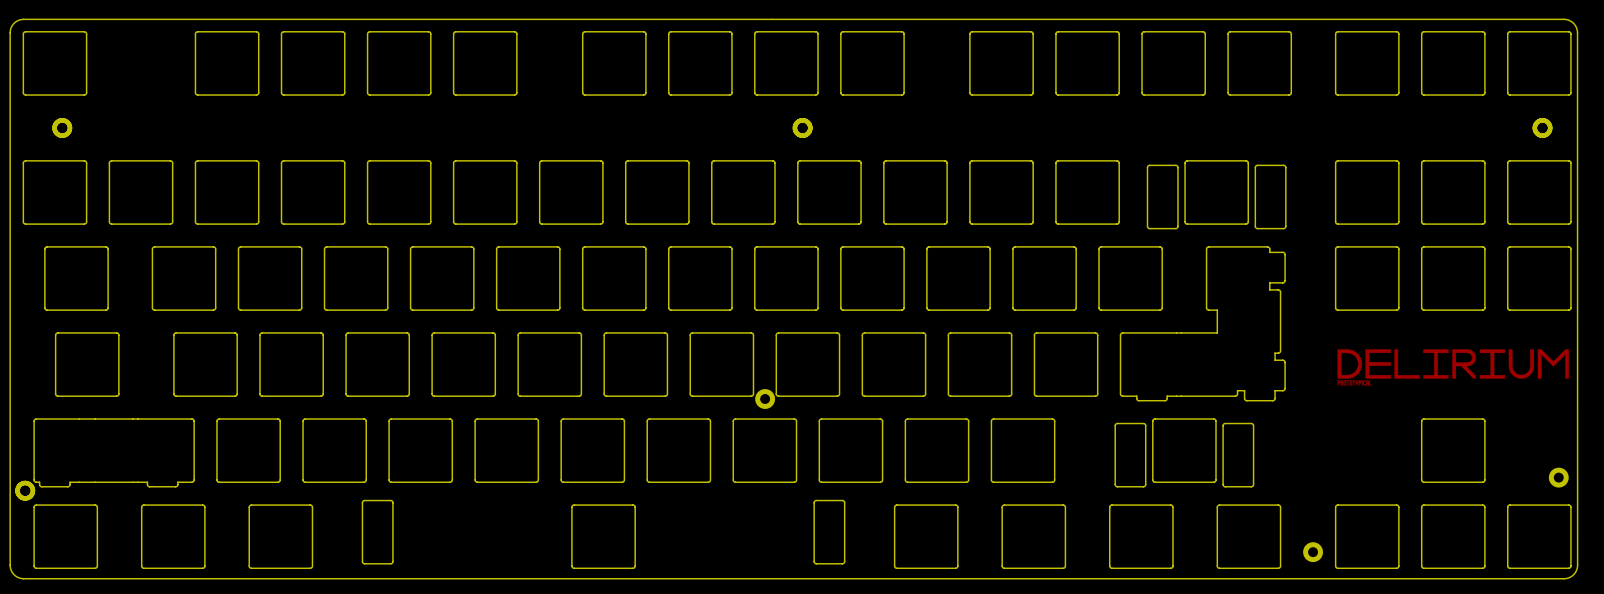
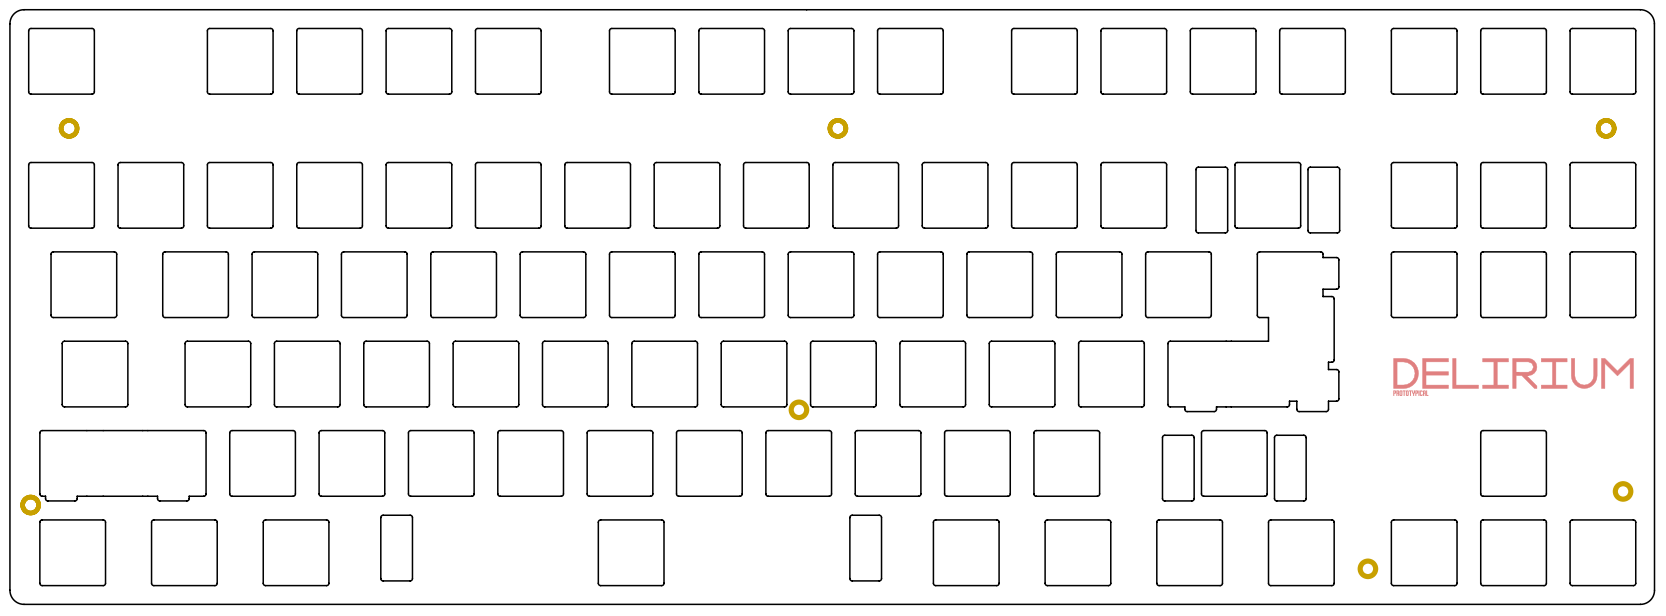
board edge: (23, 19) (1569, 20) (1574, 24) (1577, 32) (1576, 570) (1572, 575) (1564, 578) (18, 577) (12, 573) (10, 565) (10, 32) (14, 23) (23, 19) -> (24, 9) (14, 13) (9, 23) (9, 590) (12, 598) (18, 603) (1640, 604) (1649, 601) (1653, 595) (1654, 23) (1652, 16) (1645, 10) (24, 9)

